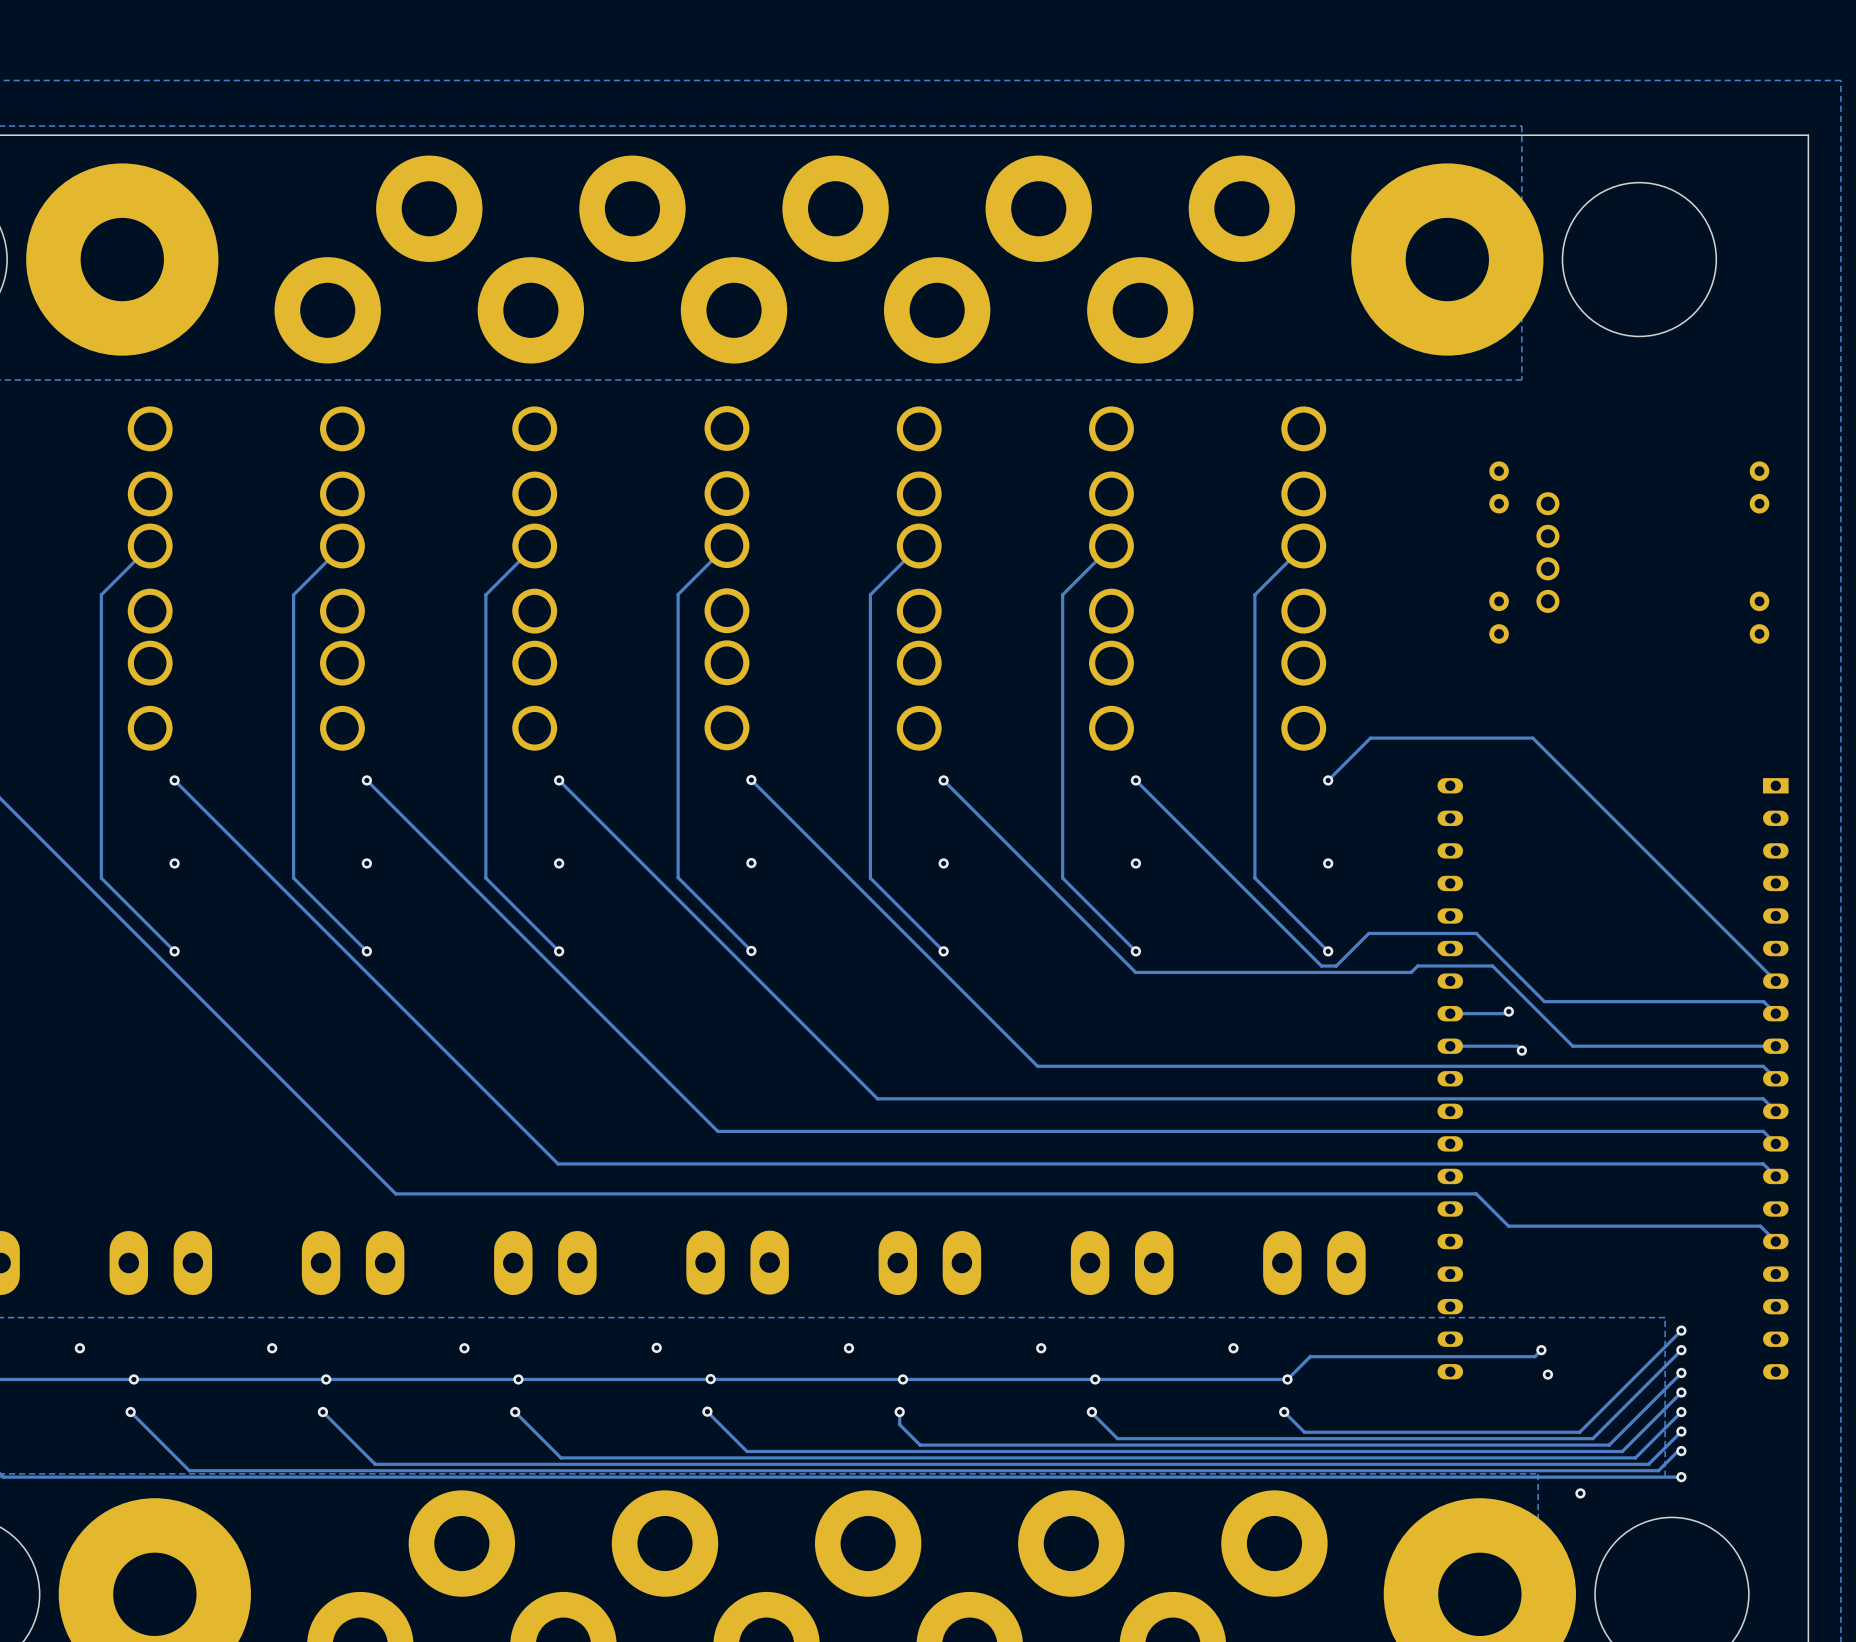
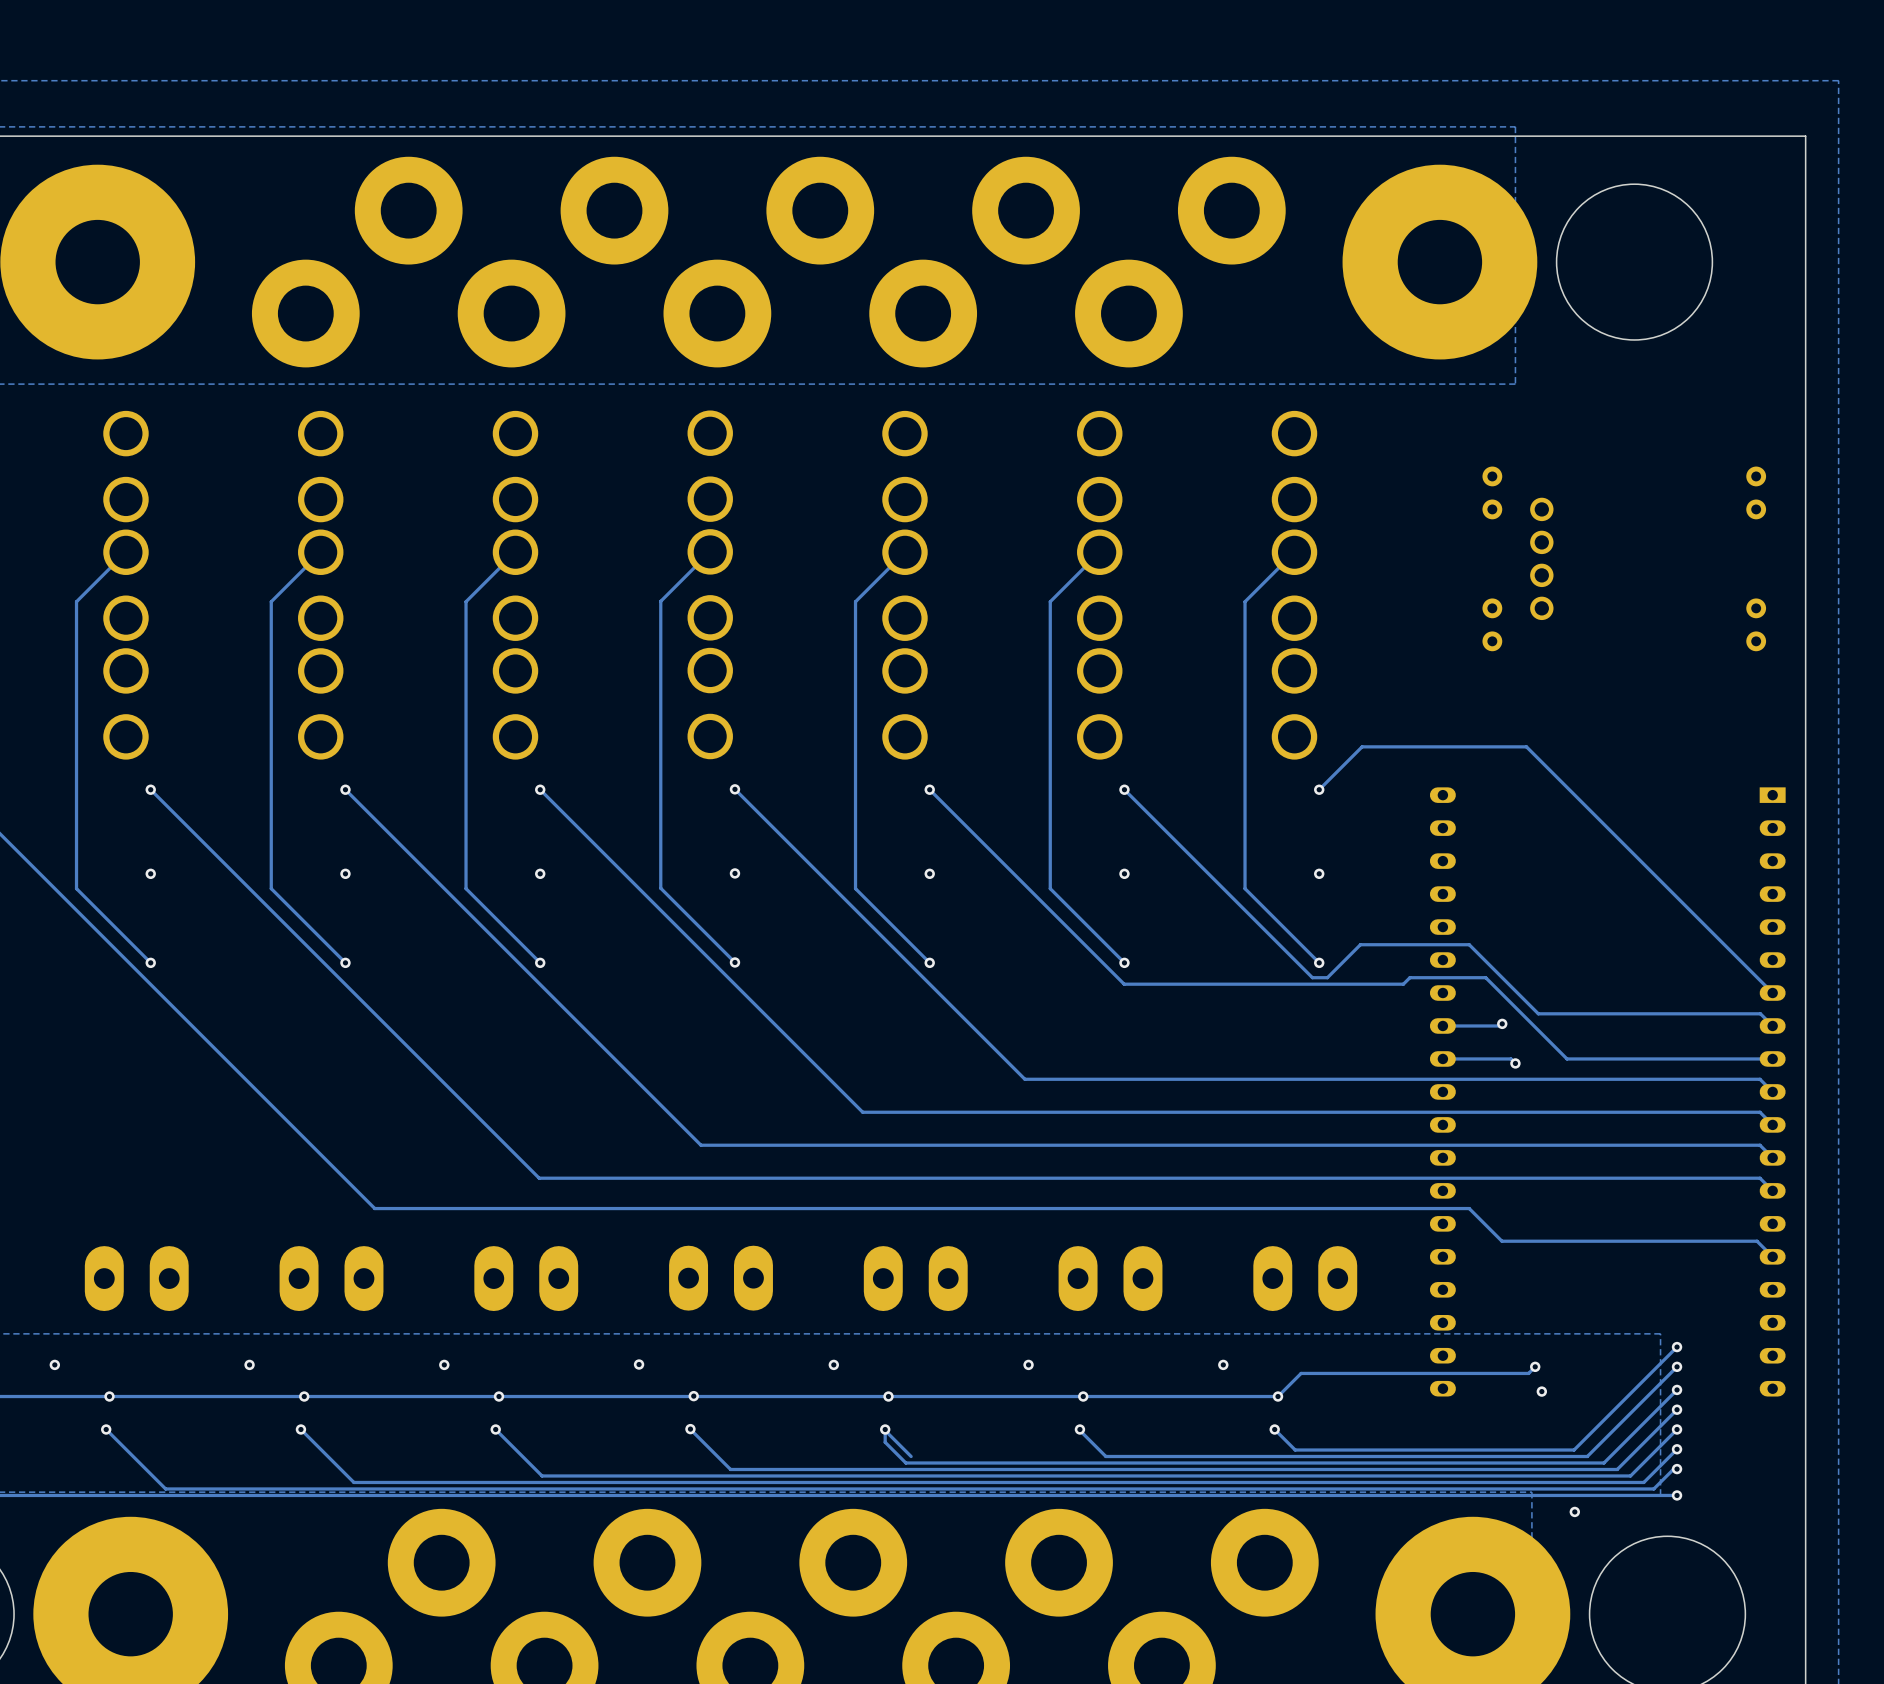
track: none -> (885, 1430) (911, 1456)

